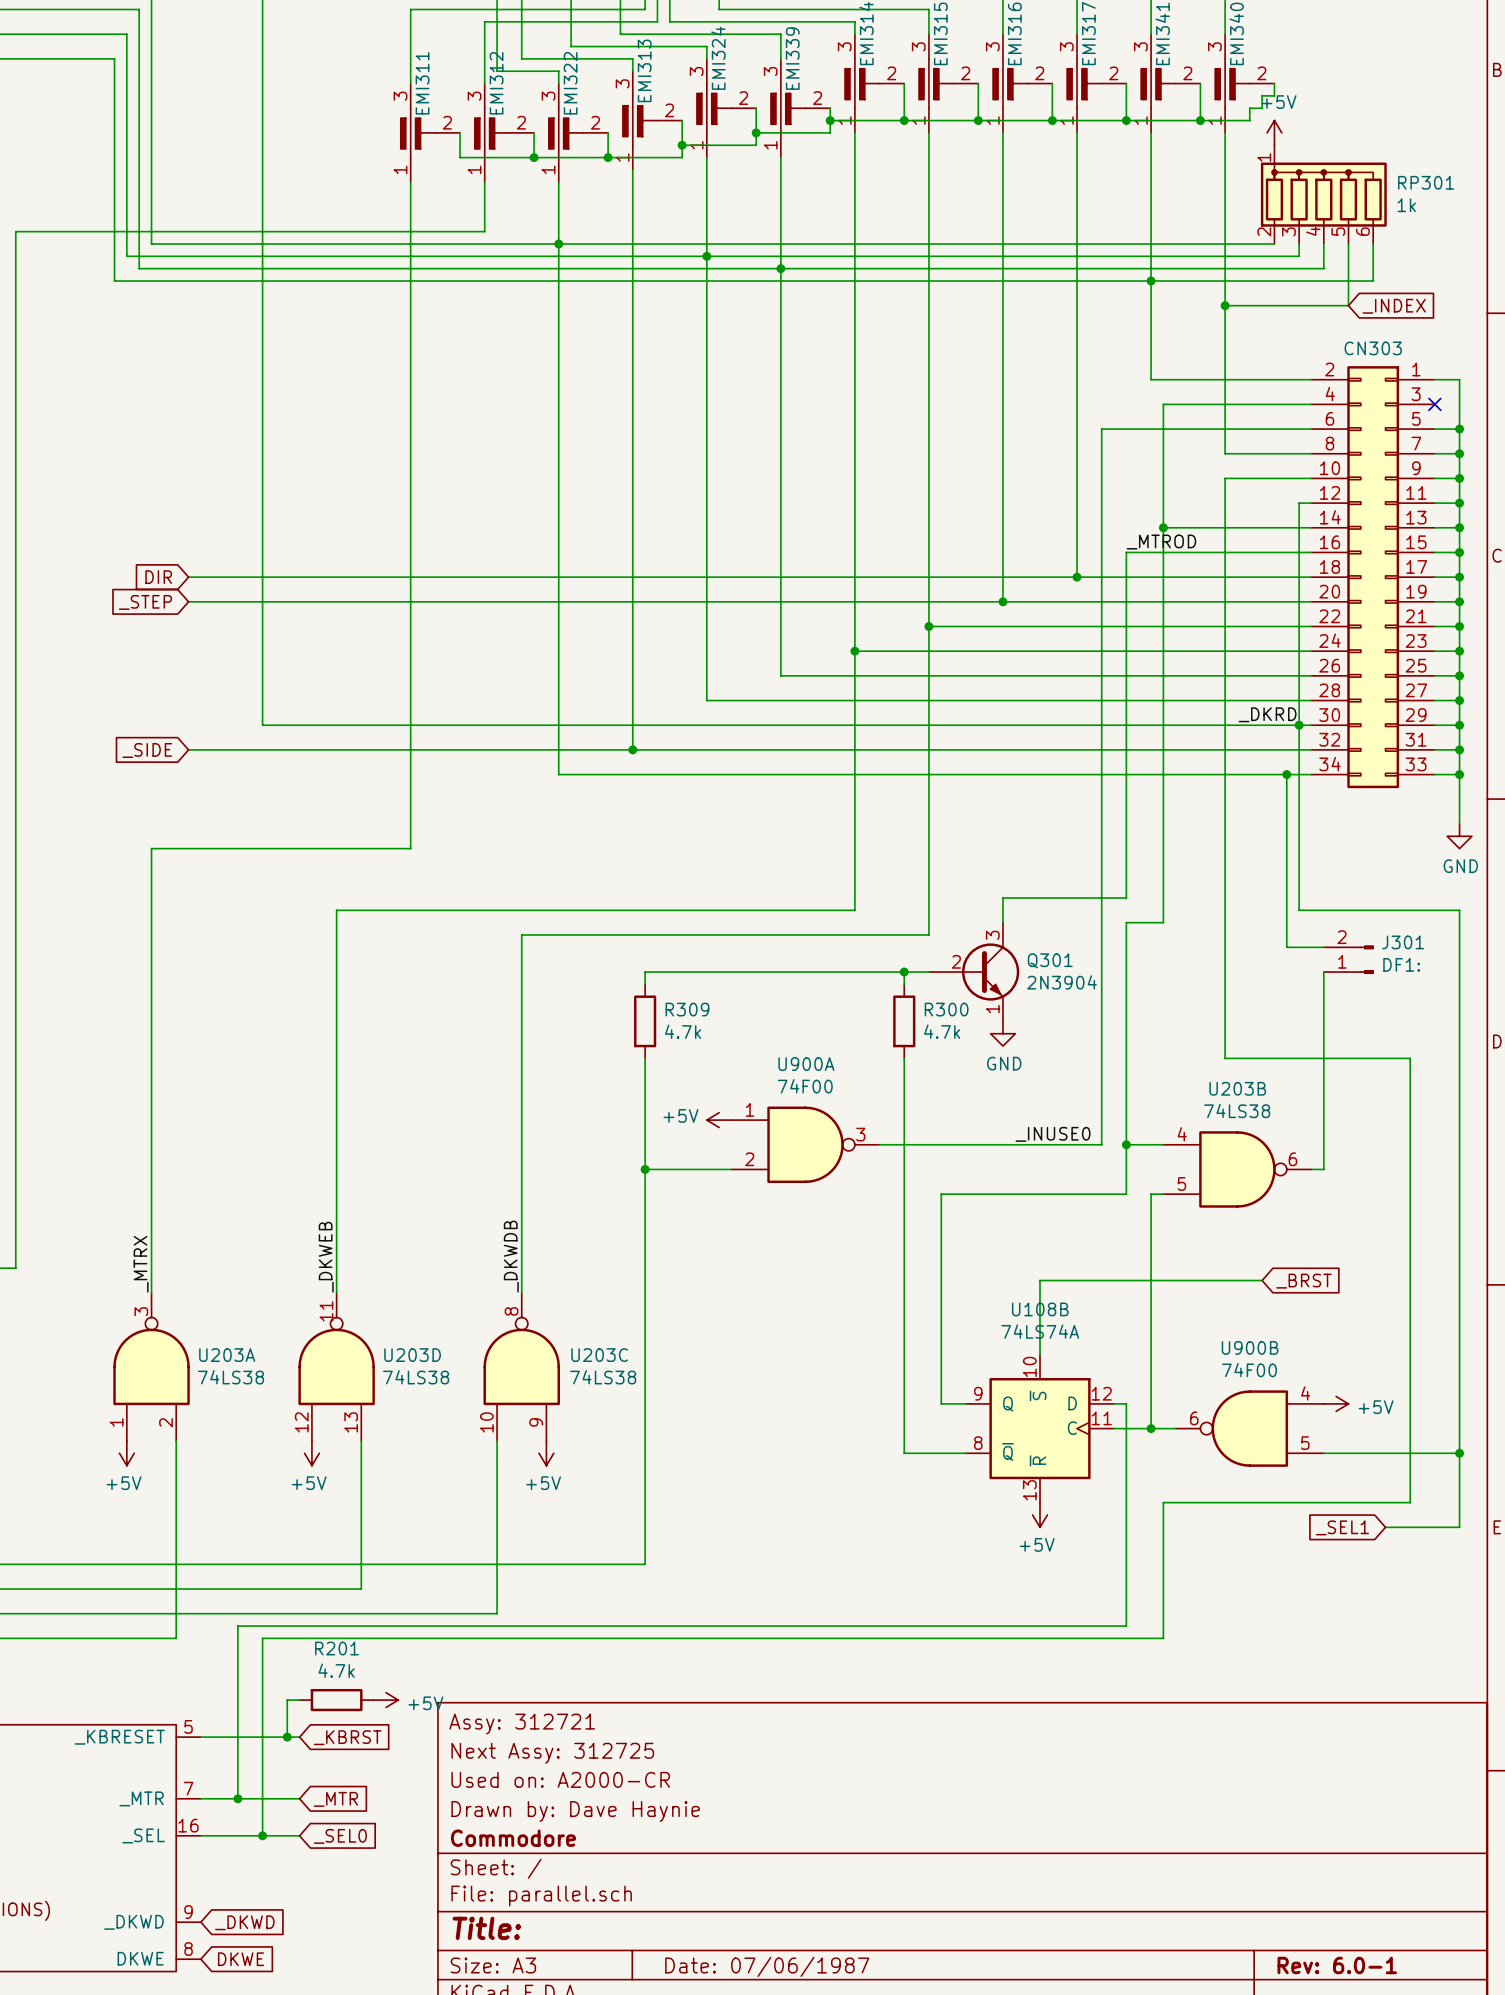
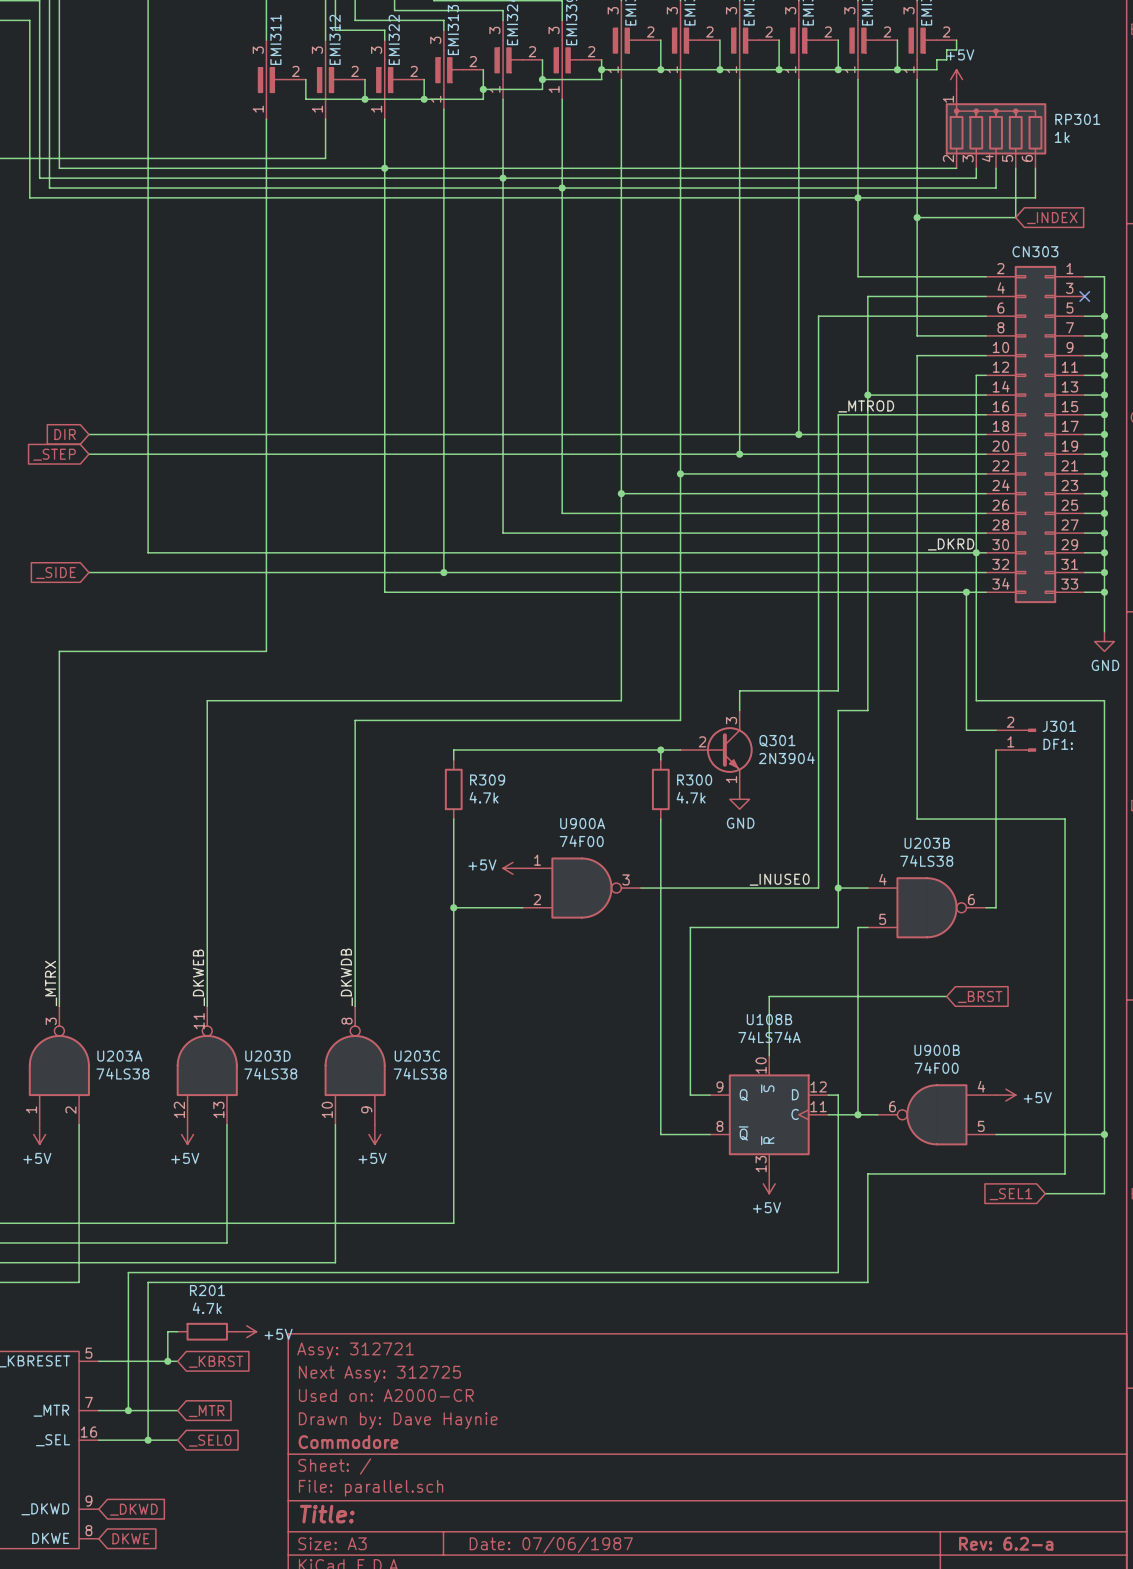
title block: Rev: 6.0-1 (1337, 1965) -> Rev: 6.2-a (1006, 1543)

